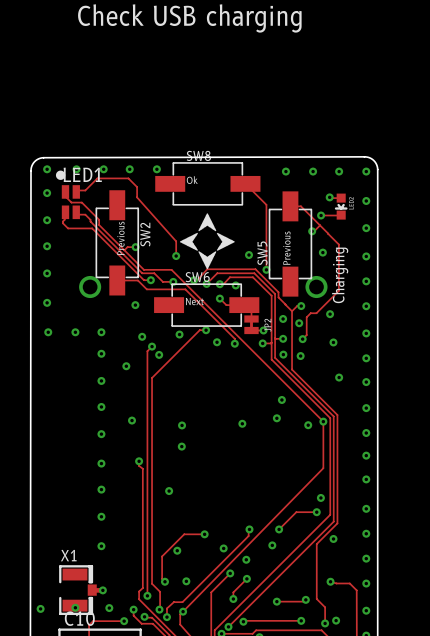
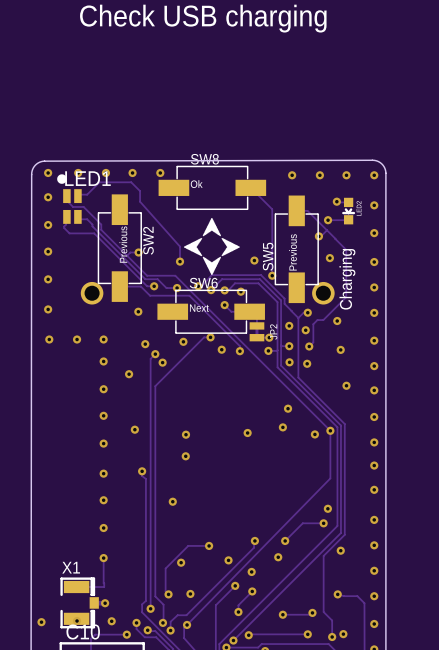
track: none -> (103, 558) (104, 587) (76, 587)

